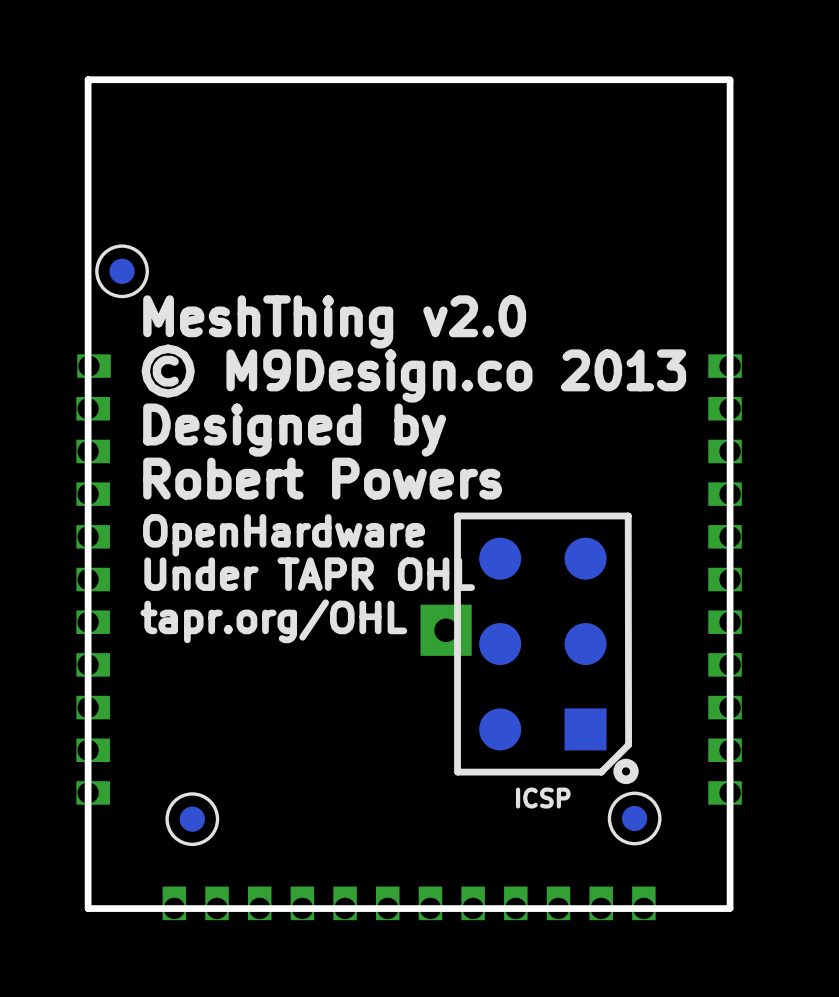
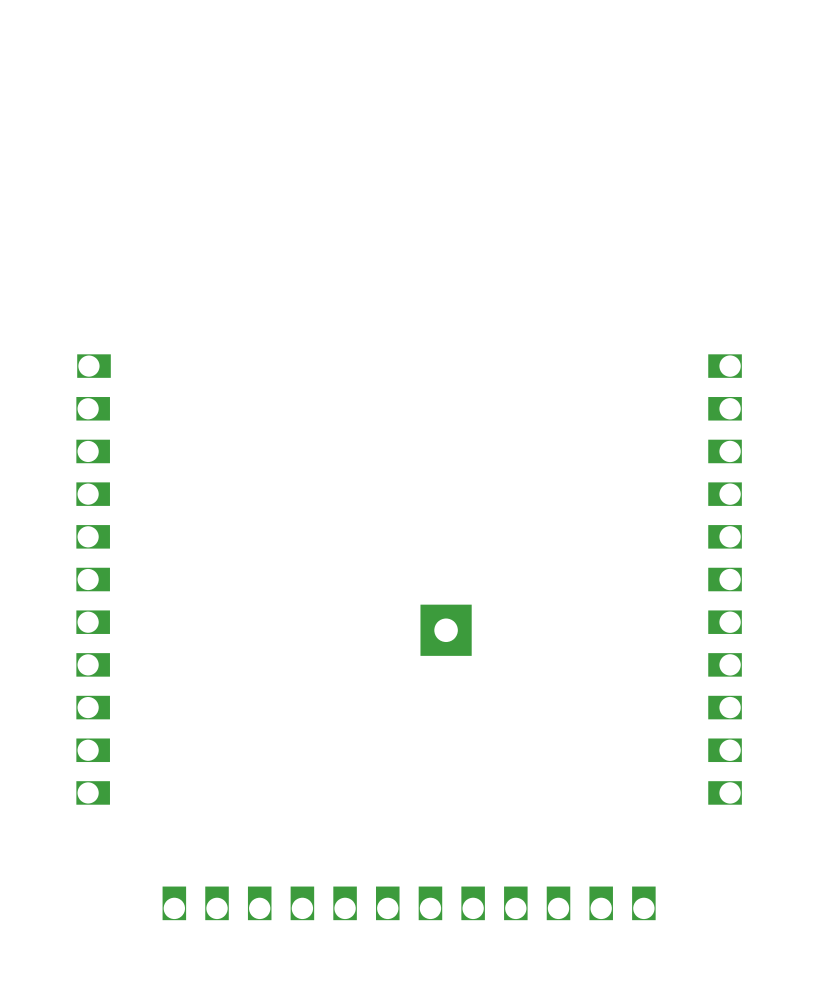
board edge: (730, 79) (88, 79) (88, 908) (730, 908) -> none
board edge: (730, 80) (730, 907) -> none
part: (122, 271) -> none
text: MeshThing v2.0 (334, 321) -> none
text: © M9Design.co 2013 (413, 373) -> none
text: Designed by (294, 430) -> none
text: Robert Powers (322, 478) -> none
text: OpenHardware (284, 535) -> none
text: Under TAPR OHL (309, 574) -> none
text: tapr.org/OHL (273, 621) -> none
part: (546, 648) -> none
part: (634, 818) -> none
part: (192, 819) -> none

